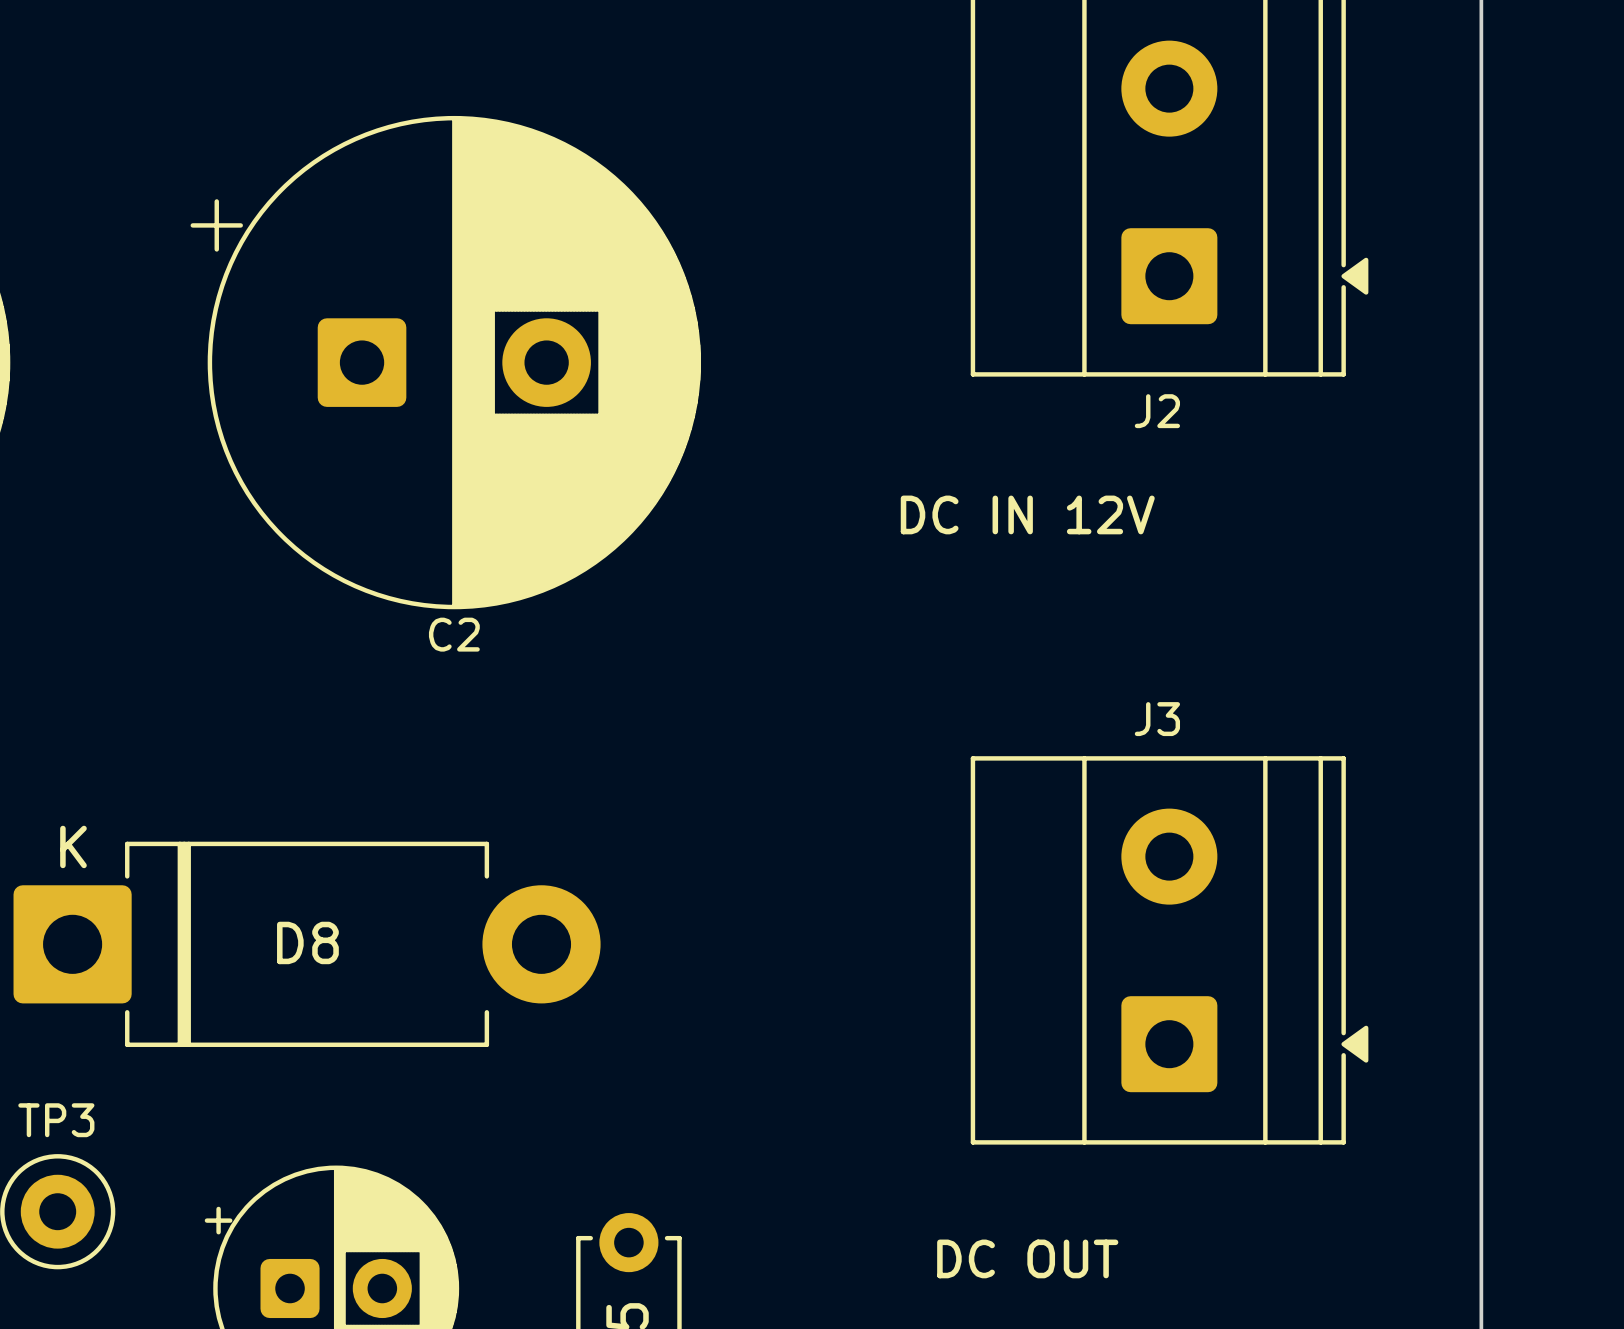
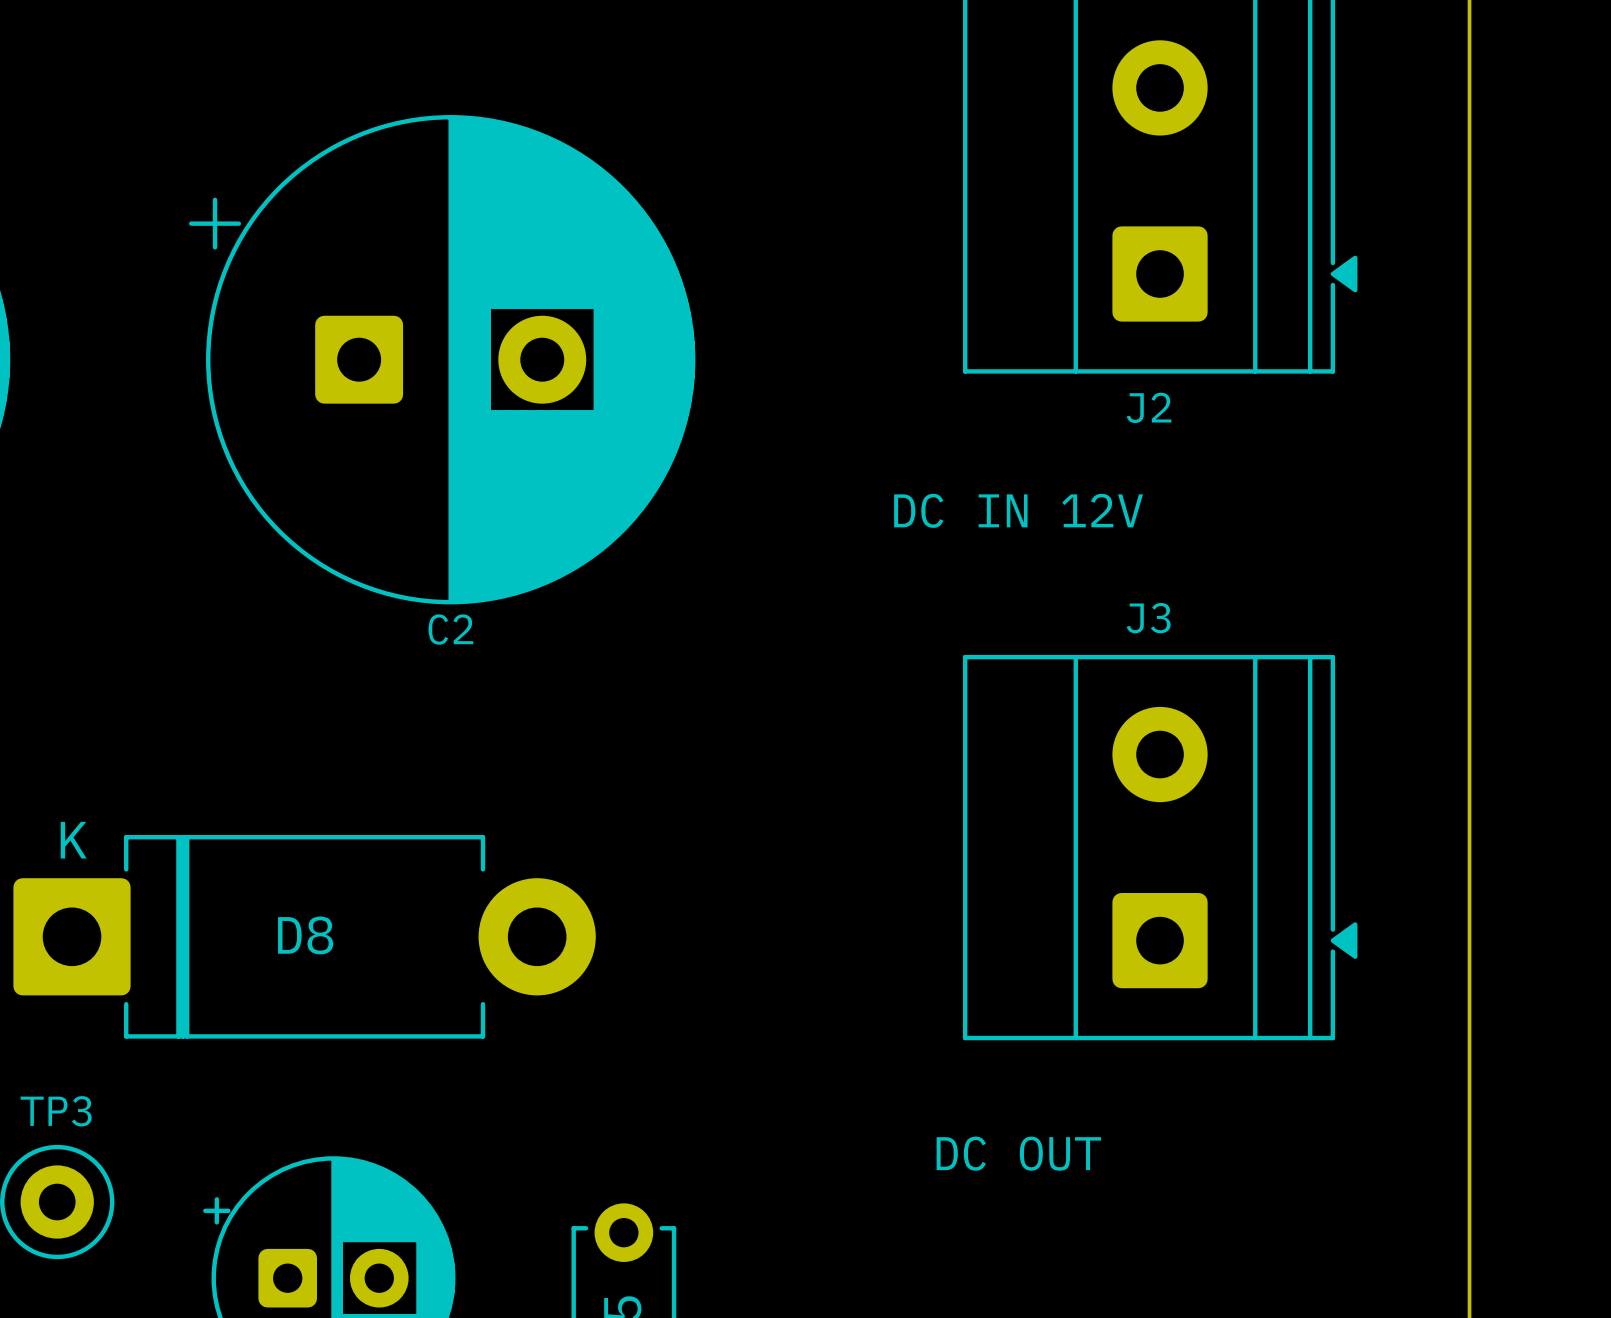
J3 position: (1169, 950) -> (1160, 847)
text position: DC OUT (1027, 1258) -> DC OUT (1018, 1153)

